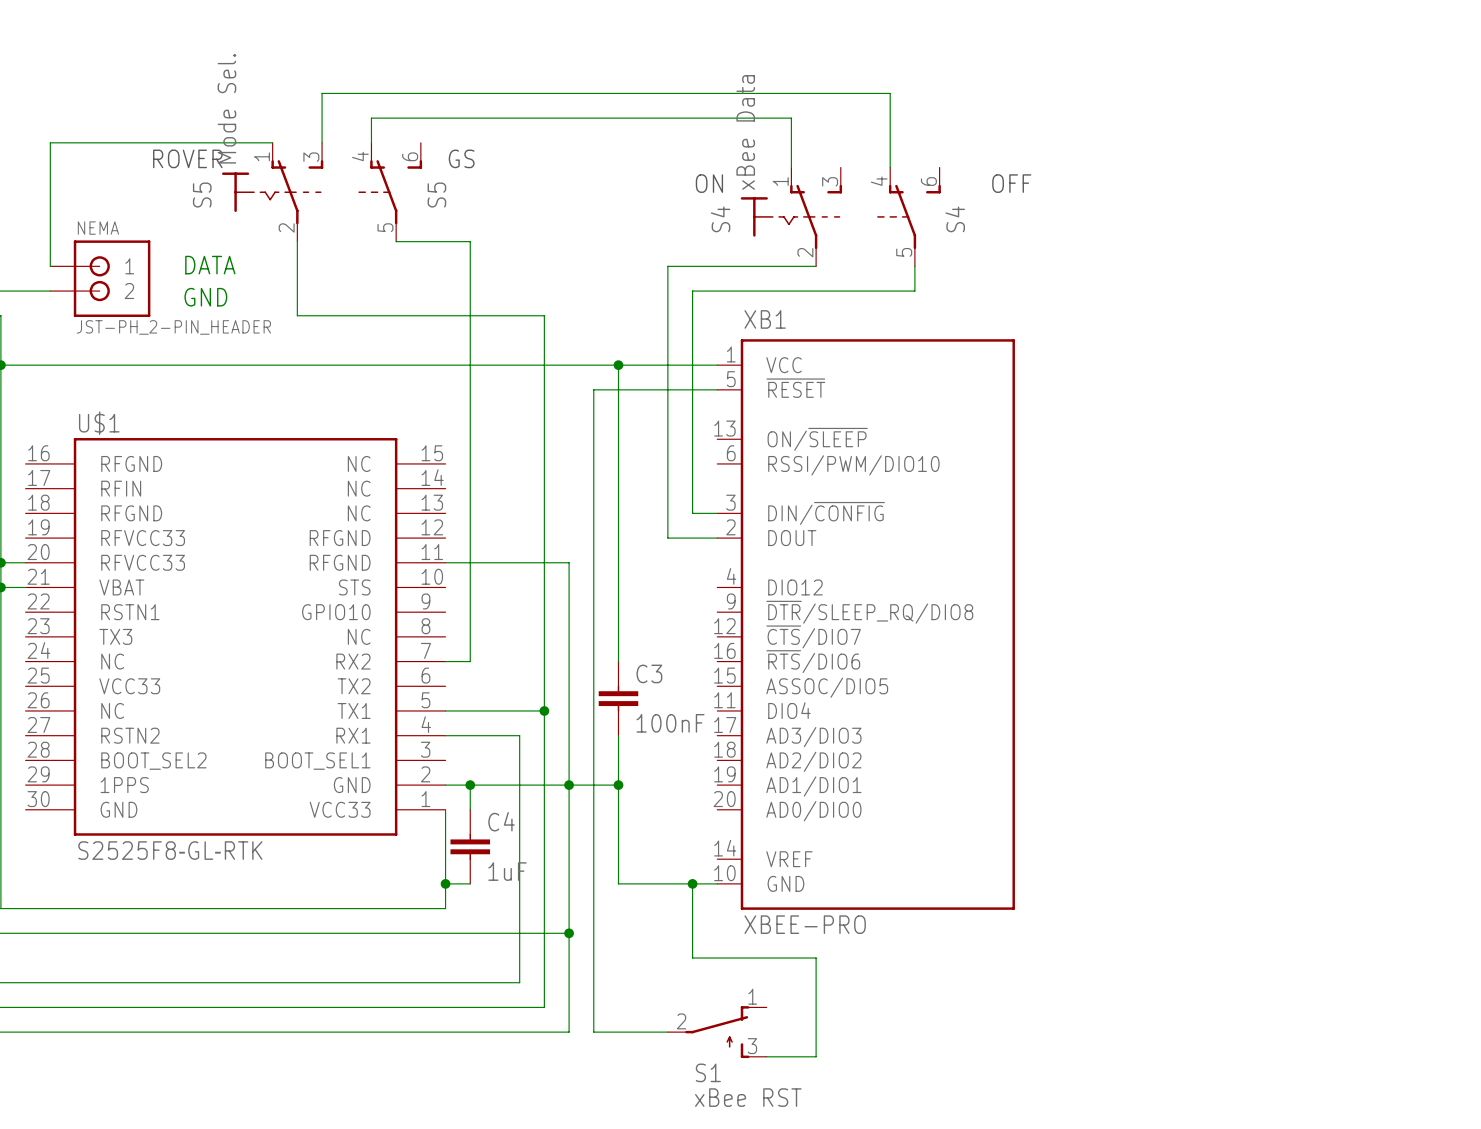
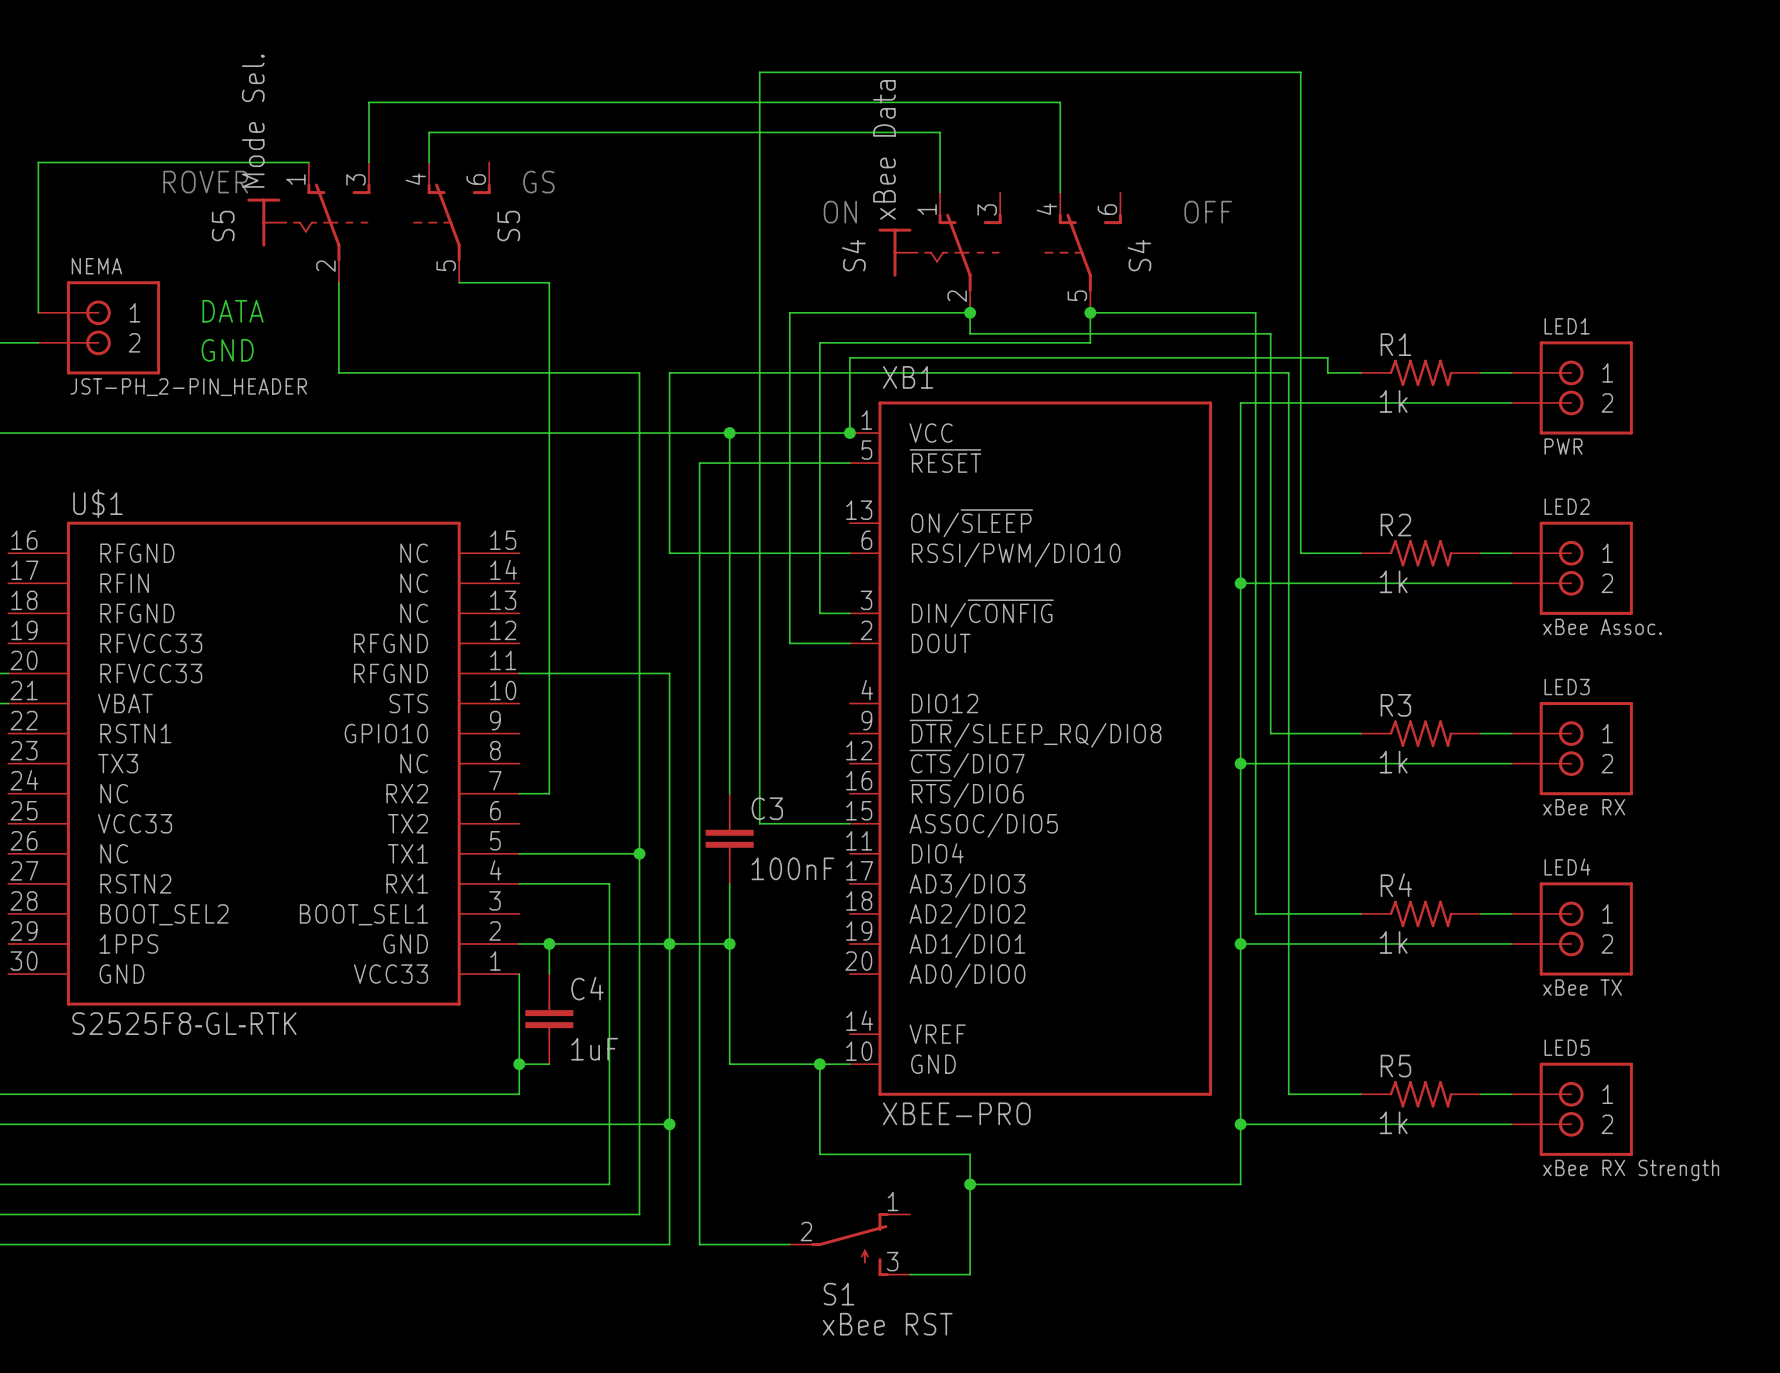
wire: none -> (970, 312) (970, 333) (1270, 333) (1270, 733) (1360, 733)
junction: none -> (970, 312)
wire: none -> (1090, 312) (1255, 312) (1255, 913) (1360, 913)
junction: none -> (1090, 312)
wire: none -> (1360, 372) (1327, 372) (1327, 357) (849, 357) (849, 433)
R1: none -> 1k (1420, 372)
wire: none -> (1481, 372) (1511, 372)
LED1: none -> PWR (1572, 387)
wire: none -> (1511, 402) (1240, 402) (1240, 1184) (970, 1184)
junction: none -> (849, 433)
wire: none -> (849, 553) (669, 553) (669, 372) (1288, 372) (1288, 1094) (1360, 1094)
wire: none -> (1360, 553) (1300, 553) (1300, 72) (759, 72) (759, 823) (849, 823)
R2: none -> 1k (1420, 553)
wire: none -> (1481, 553) (1511, 553)
LED2: none -> xBee Assoc. (1572, 568)
wire: none -> (1240, 583) (1511, 583)
junction: none -> (1240, 583)
R3: none -> 1k (1420, 733)
wire: none -> (1481, 733) (1511, 733)
LED3: none -> xBee RX (1572, 748)
wire: none -> (1240, 763) (1511, 763)
junction: none -> (1240, 763)
R4: none -> 1k (1420, 913)
wire: none -> (1481, 913) (1511, 913)
LED4: none -> xBee TX (1572, 928)
wire: none -> (1240, 943) (1511, 943)
junction: none -> (1240, 943)
R5: none -> 1k (1420, 1094)
wire: none -> (1481, 1094) (1511, 1094)
LED5: none -> xBee RX Strength (1572, 1109)
wire: none -> (1240, 1124) (1511, 1124)
junction: none -> (1240, 1124)
junction: none -> (970, 1184)

